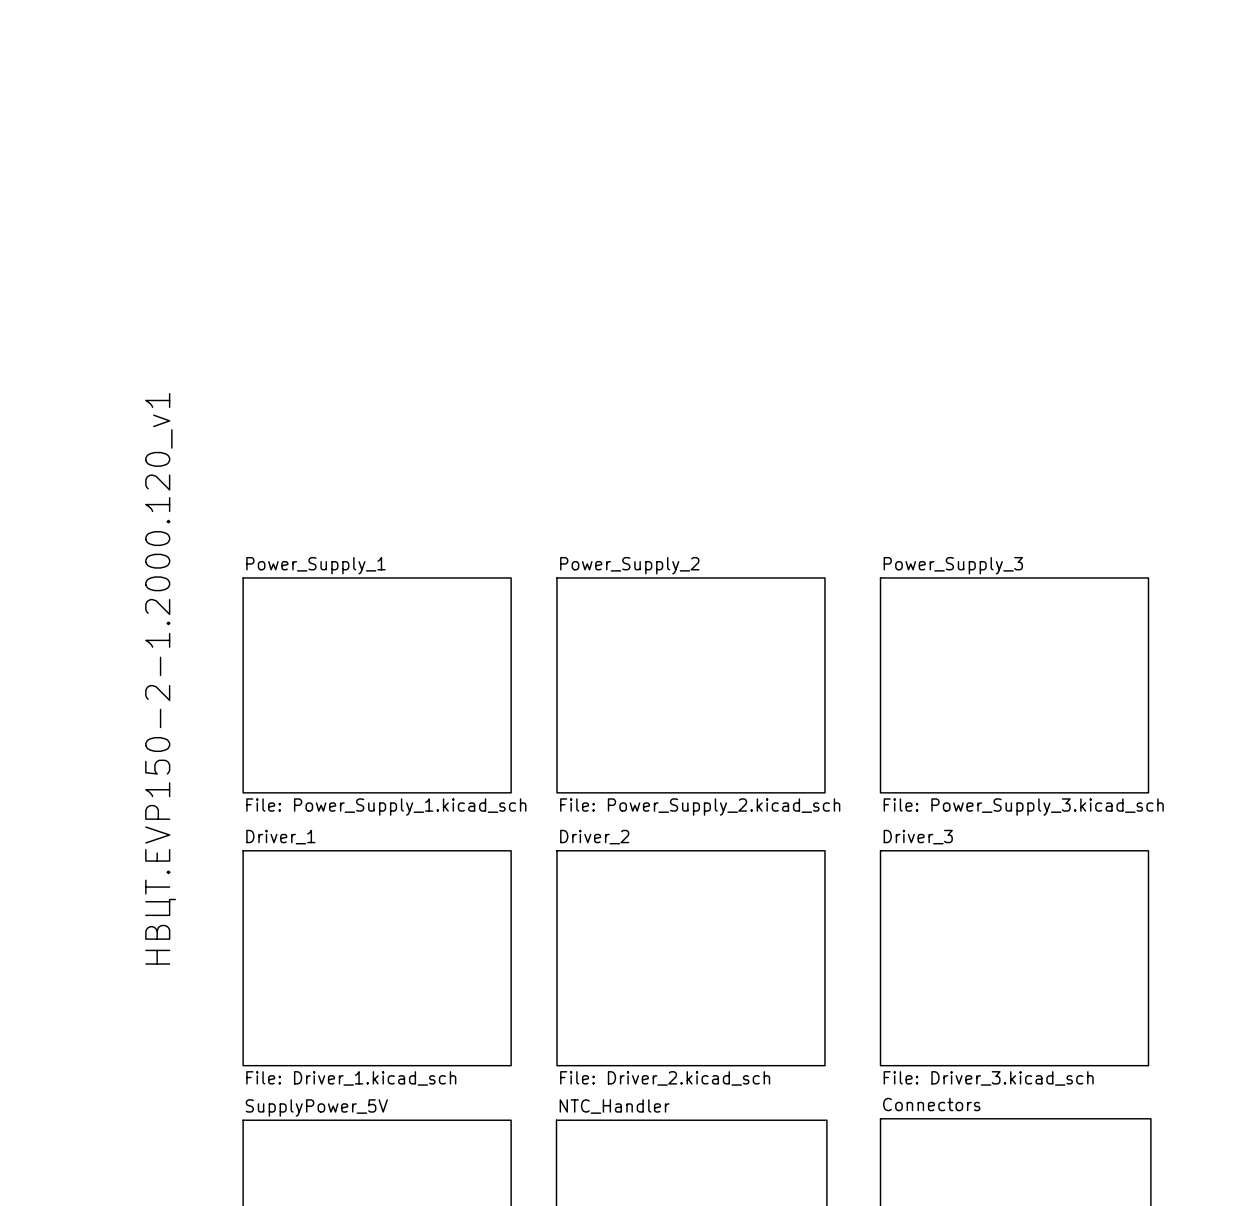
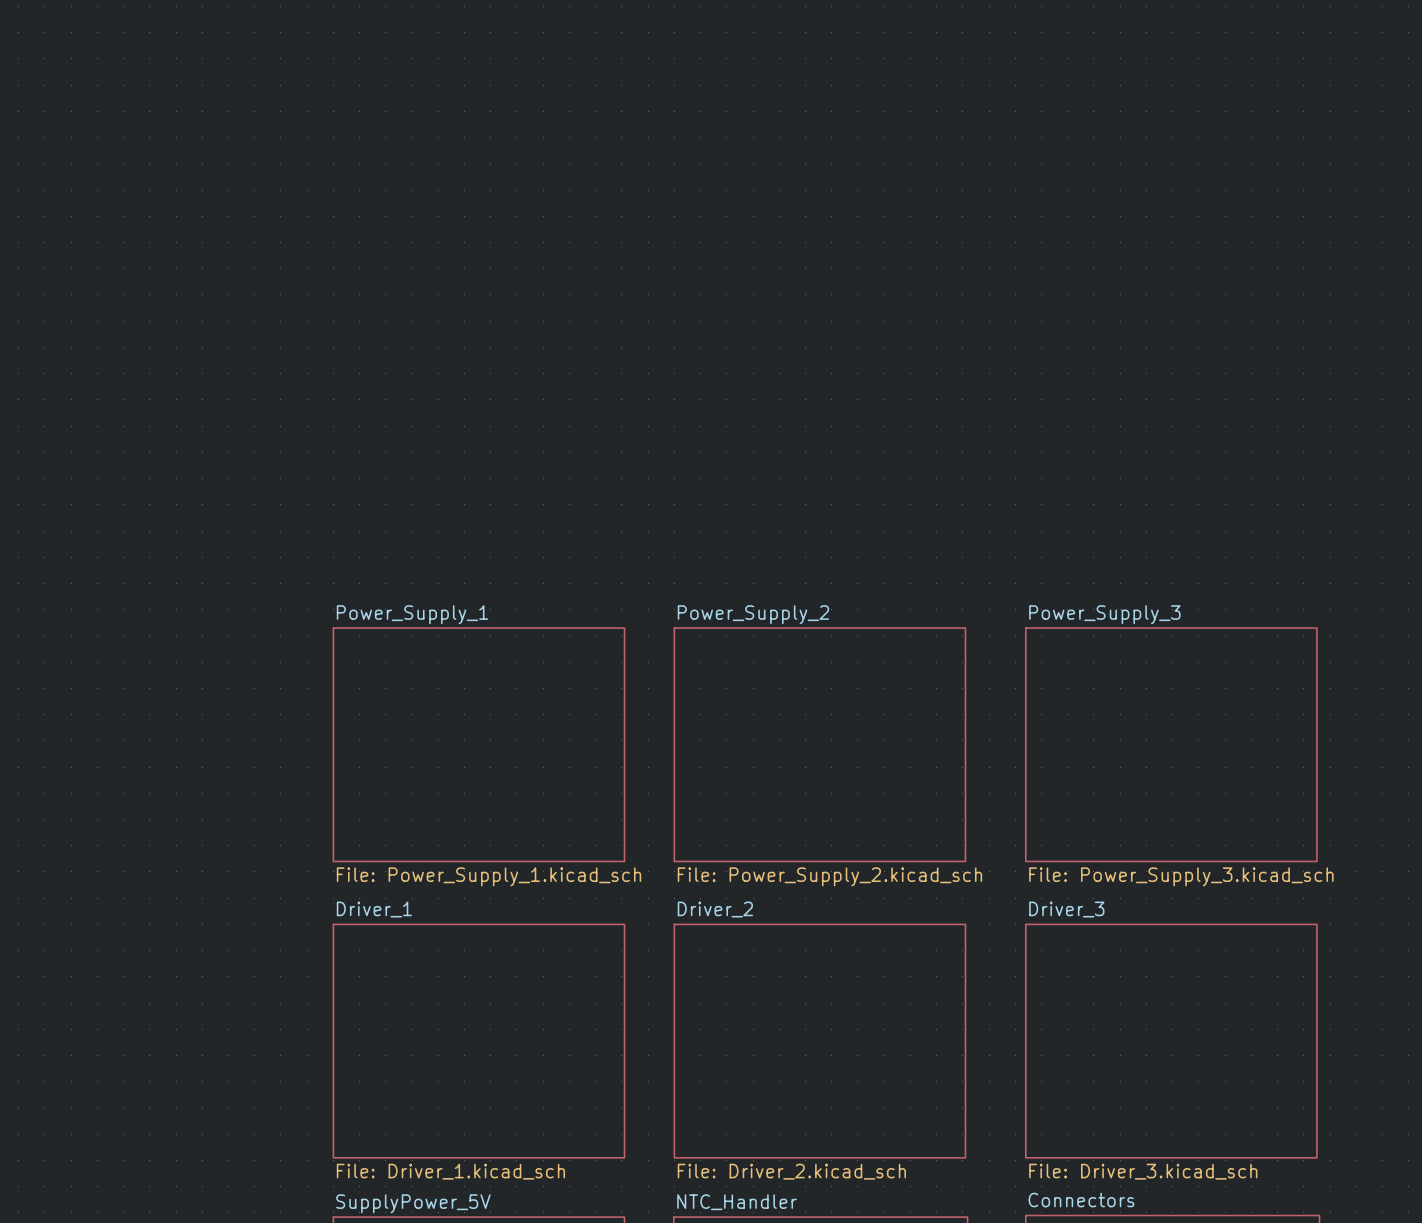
text: НВЦТ.EVP150-2-1.2000.120_v1 (160, 678) -> none

